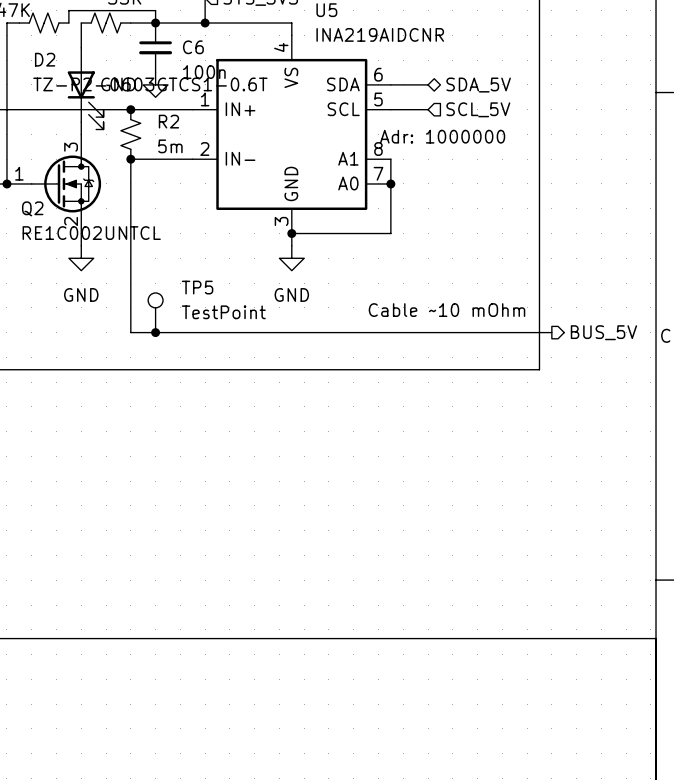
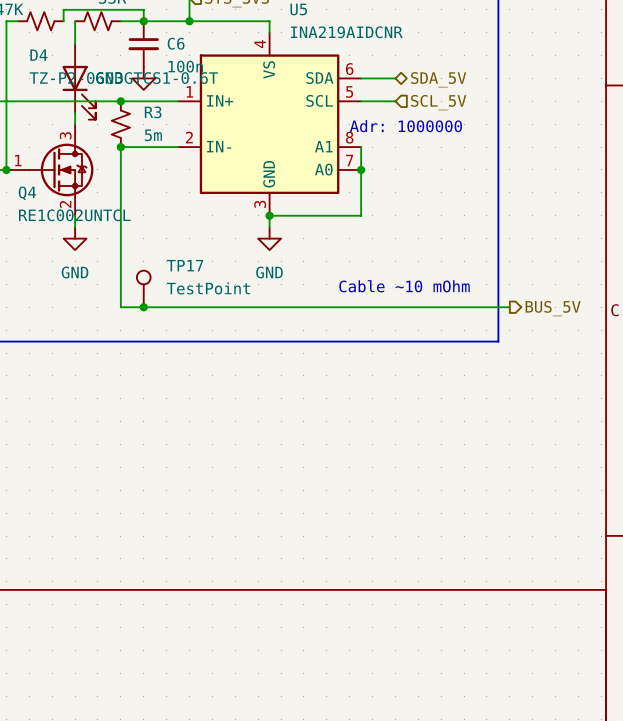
D2 name: D2 (45, 59) -> D4 (38, 55)
R2 name: R2 (168, 121) -> R3 (153, 112)
Q2 name: Q2 (32, 208) -> Q4 (27, 193)
TP5 name: TP5 (197, 287) -> TP17 (185, 265)

